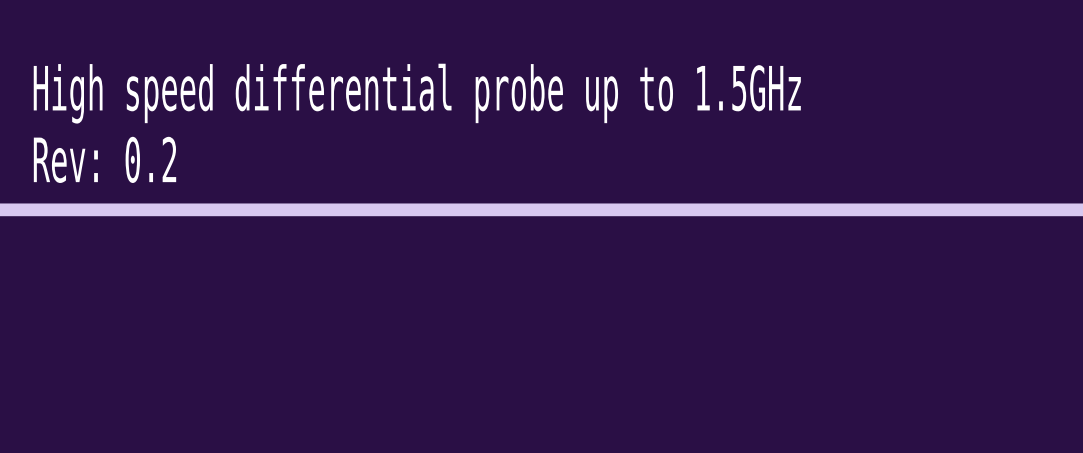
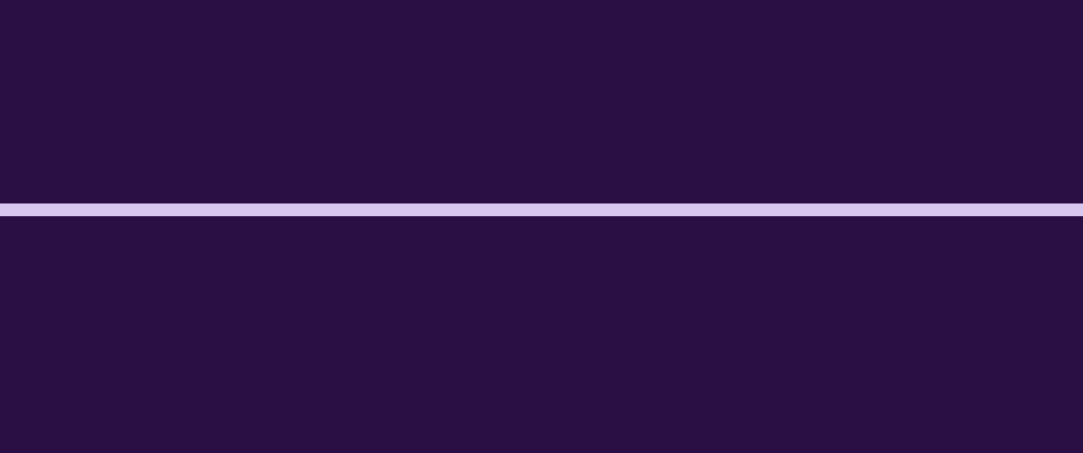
text: High speed differential probe up to 1.5GHz (417, 93) -> none
text: Rev: 0.2 (105, 159) -> none

